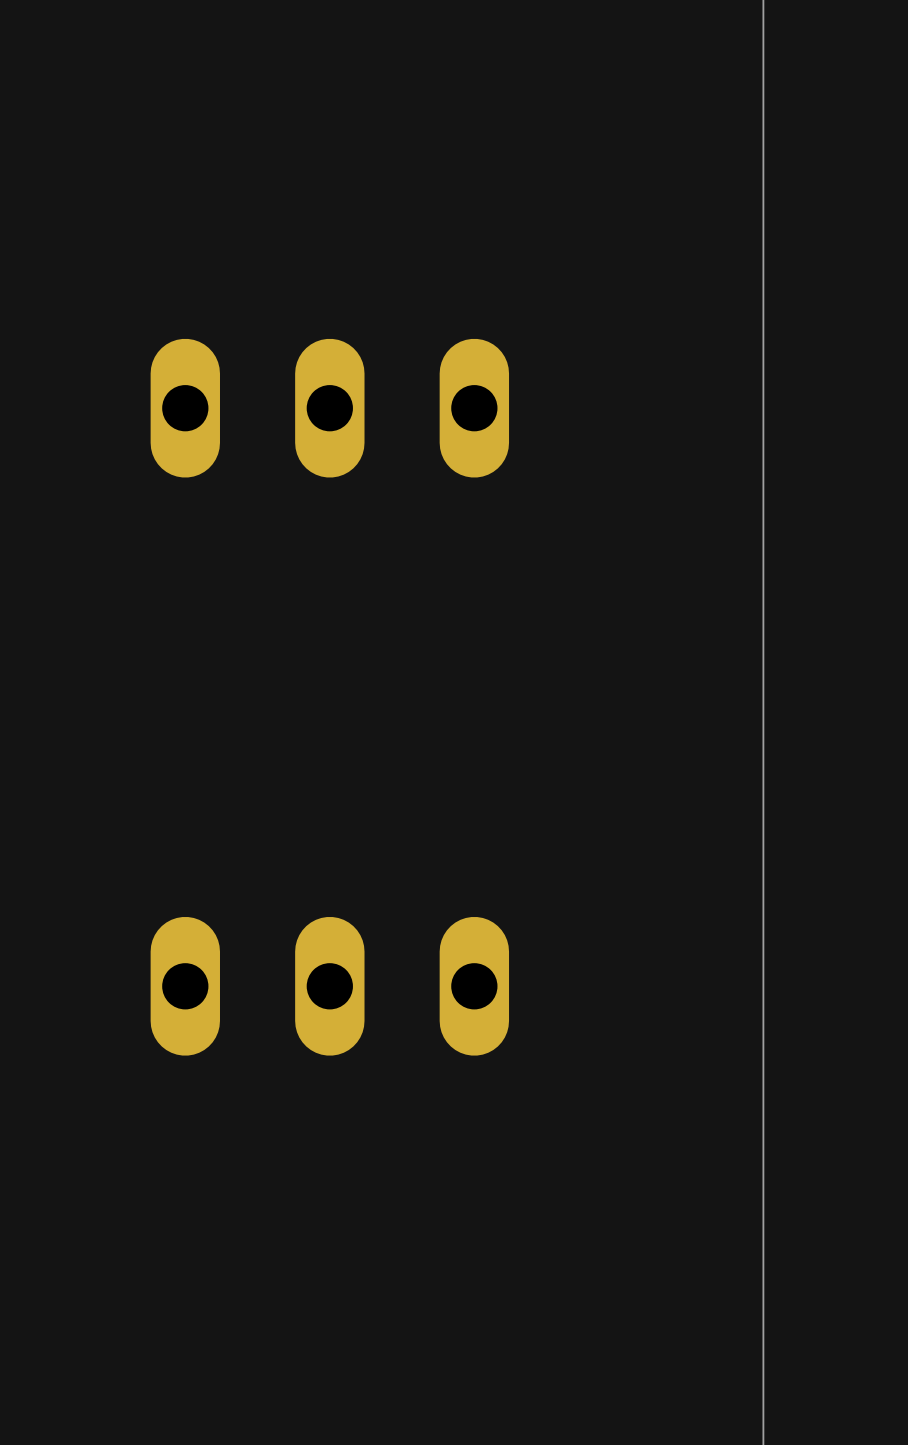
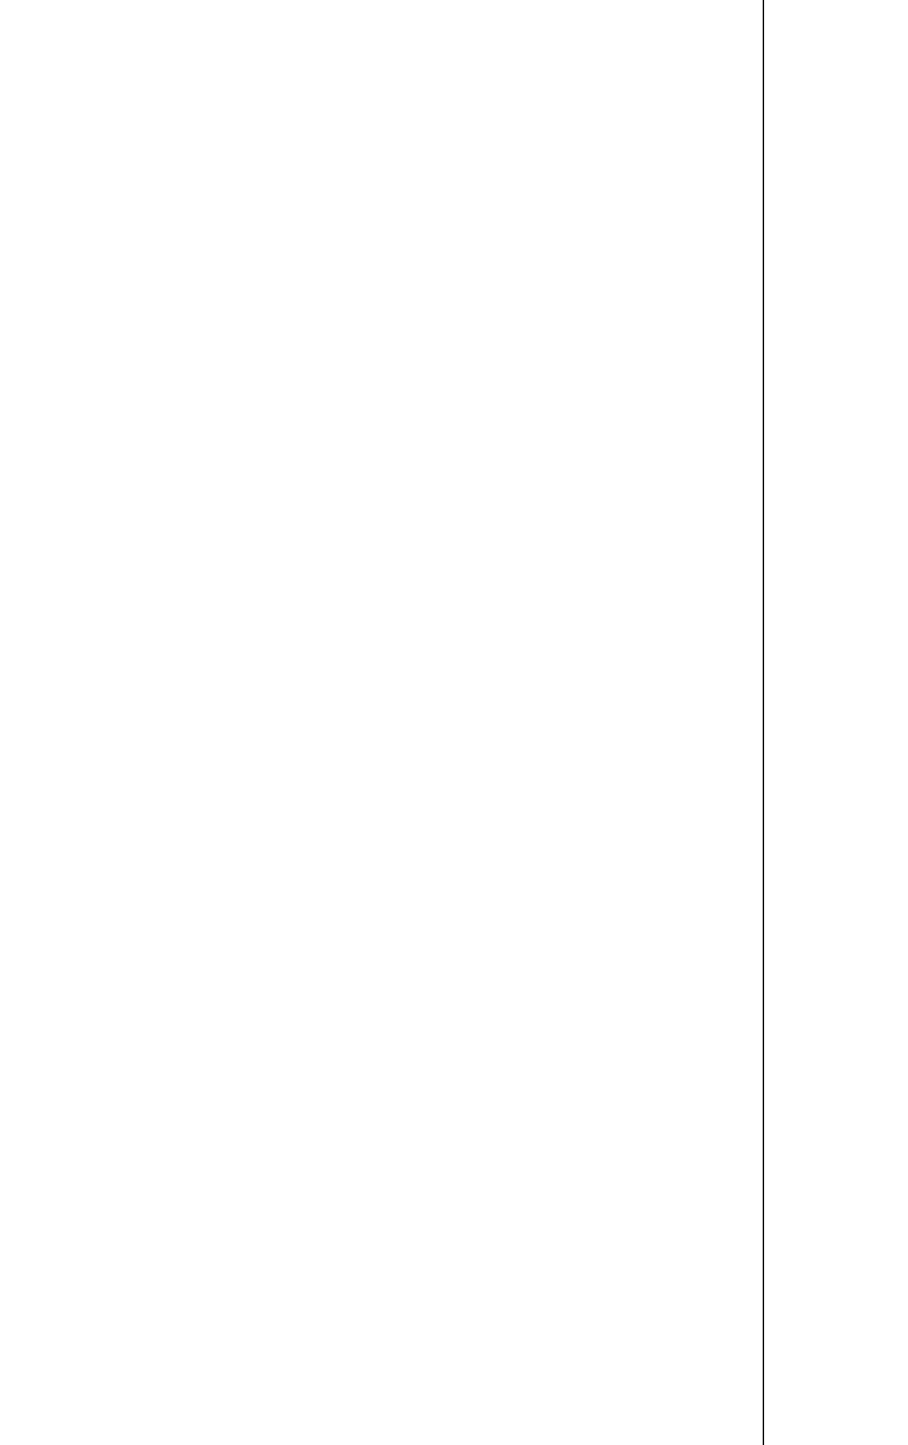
part: (329, 408) -> none
part: (329, 986) -> none

